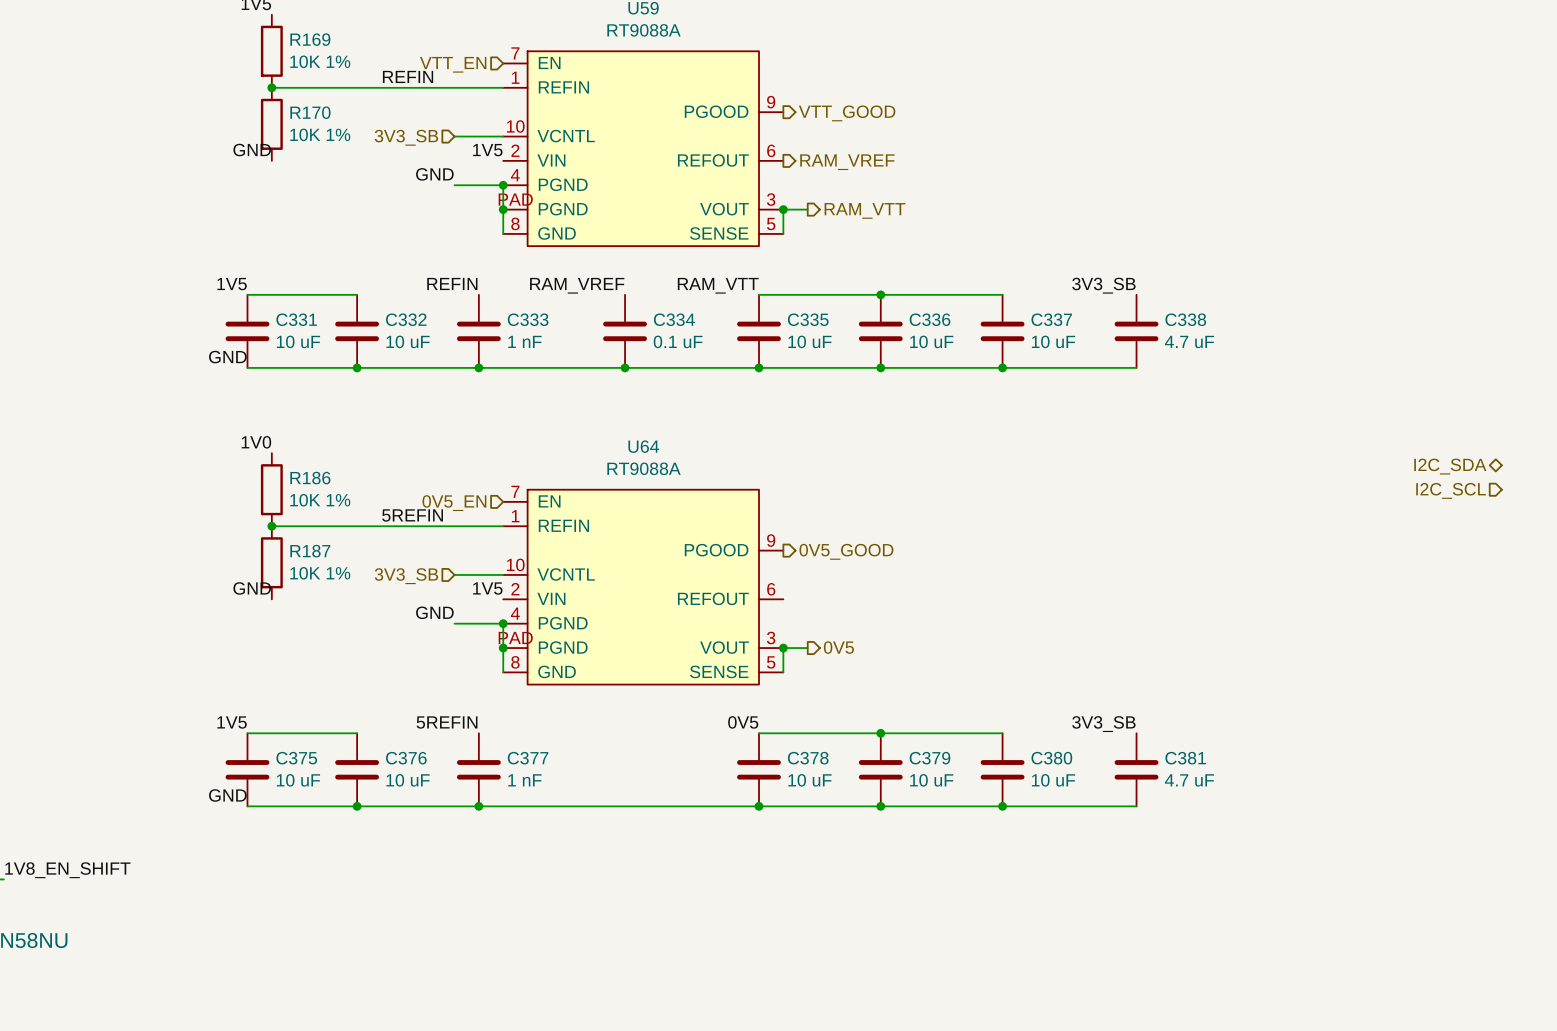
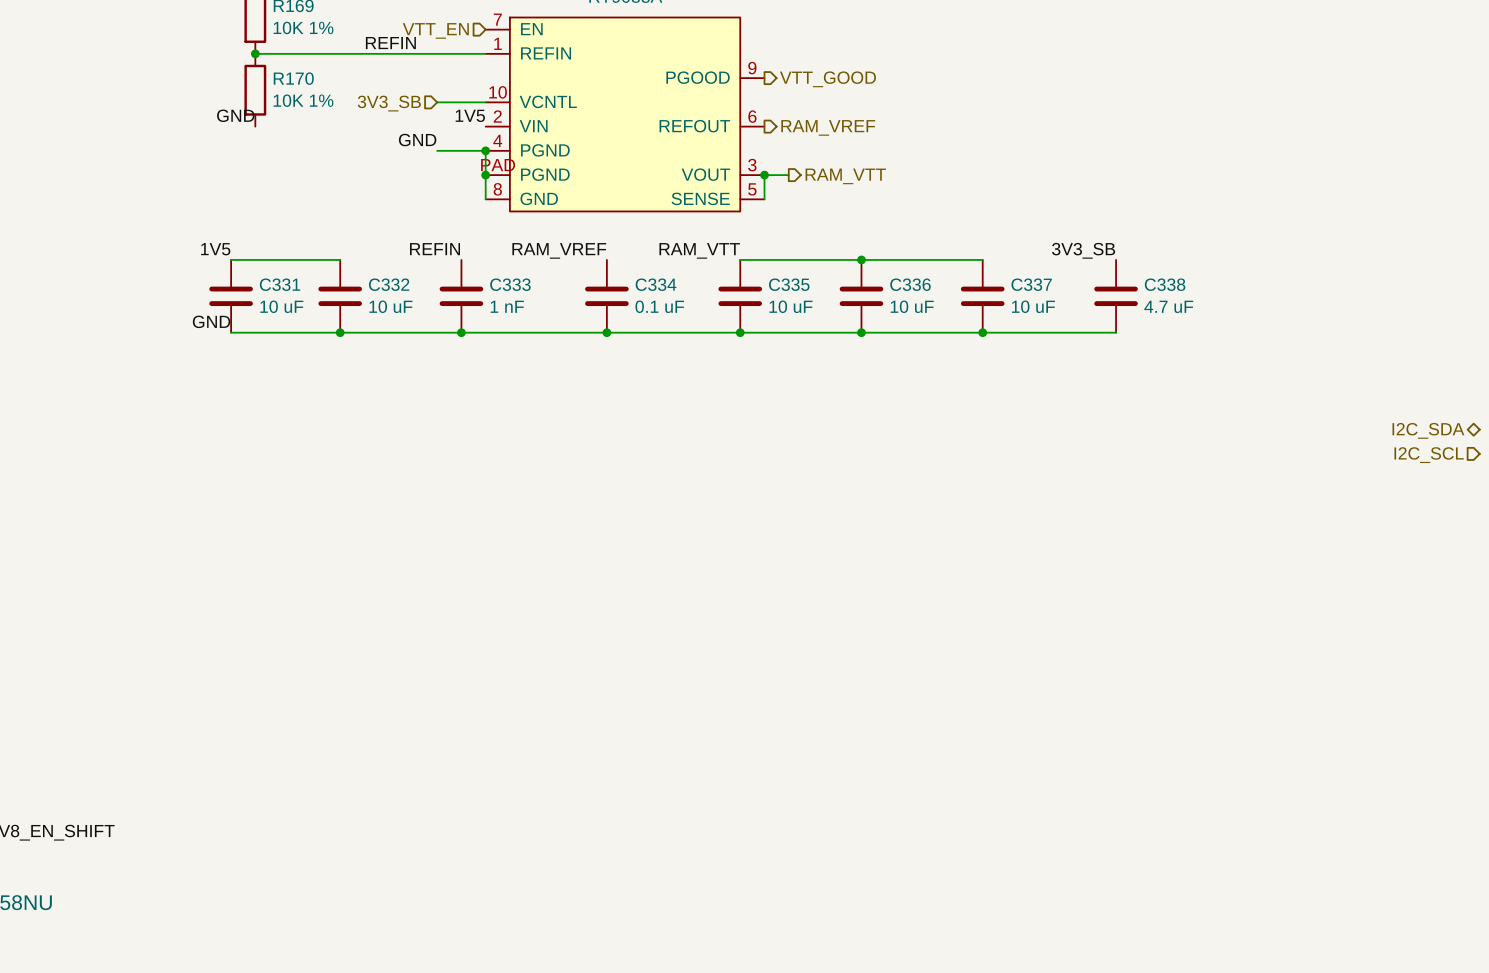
label: 1V0 (256, 442) -> none
R186: 10K 1% (271, 489) -> none
hierarchical label: 0V5_EN (454, 503) -> none
label: 5REFIN (412, 515) -> none
wire: (271, 526) (503, 526) -> none
junction: (271, 526) -> none
hierarchical label: 0V5_GOOD (846, 551) -> none
R187: 10K 1% (271, 562) -> none
wire: (454, 574) (503, 574) -> none
hierarchical label: 3V3_SB (406, 576) -> none
U64: RT9088A (643, 587) -> none
label: GND (252, 588) -> none
label: 1V5 (487, 588) -> none
label: GND (434, 612) -> none
wire: (454, 623) (503, 623) (503, 672) -> none
junction: (503, 623) -> none
hierarchical label: 0V5 (838, 647) -> none
junction: (503, 648) -> none
junction: (783, 648) -> none
wire: (807, 648) (783, 648) (783, 672) -> none
label: 1V5 (232, 722) -> none
label: 5REFIN (447, 722) -> none
label: 0V5 (743, 722) -> none
label: 3V3_SB (1103, 724) -> none
wire: (247, 733) (357, 733) -> none
wire: (758, 733) (1002, 733) -> none
junction: (880, 733) -> none
C375: 10 uF (247, 769) -> none
C376: 10 uF (357, 769) -> none
C377: 1 nF (478, 769) -> none
C378: 10 uF (758, 769) -> none
C379: 10 uF (880, 769) -> none
C380: 10 uF (1002, 769) -> none
C381: 4.7 uF (1136, 769) -> none
label: GND (227, 795) -> none
wire: (247, 806) (1136, 806) -> none
junction: (357, 806) -> none
junction: (478, 806) -> none
junction: (758, 806) -> none
junction: (880, 806) -> none
junction: (1002, 806) -> none

